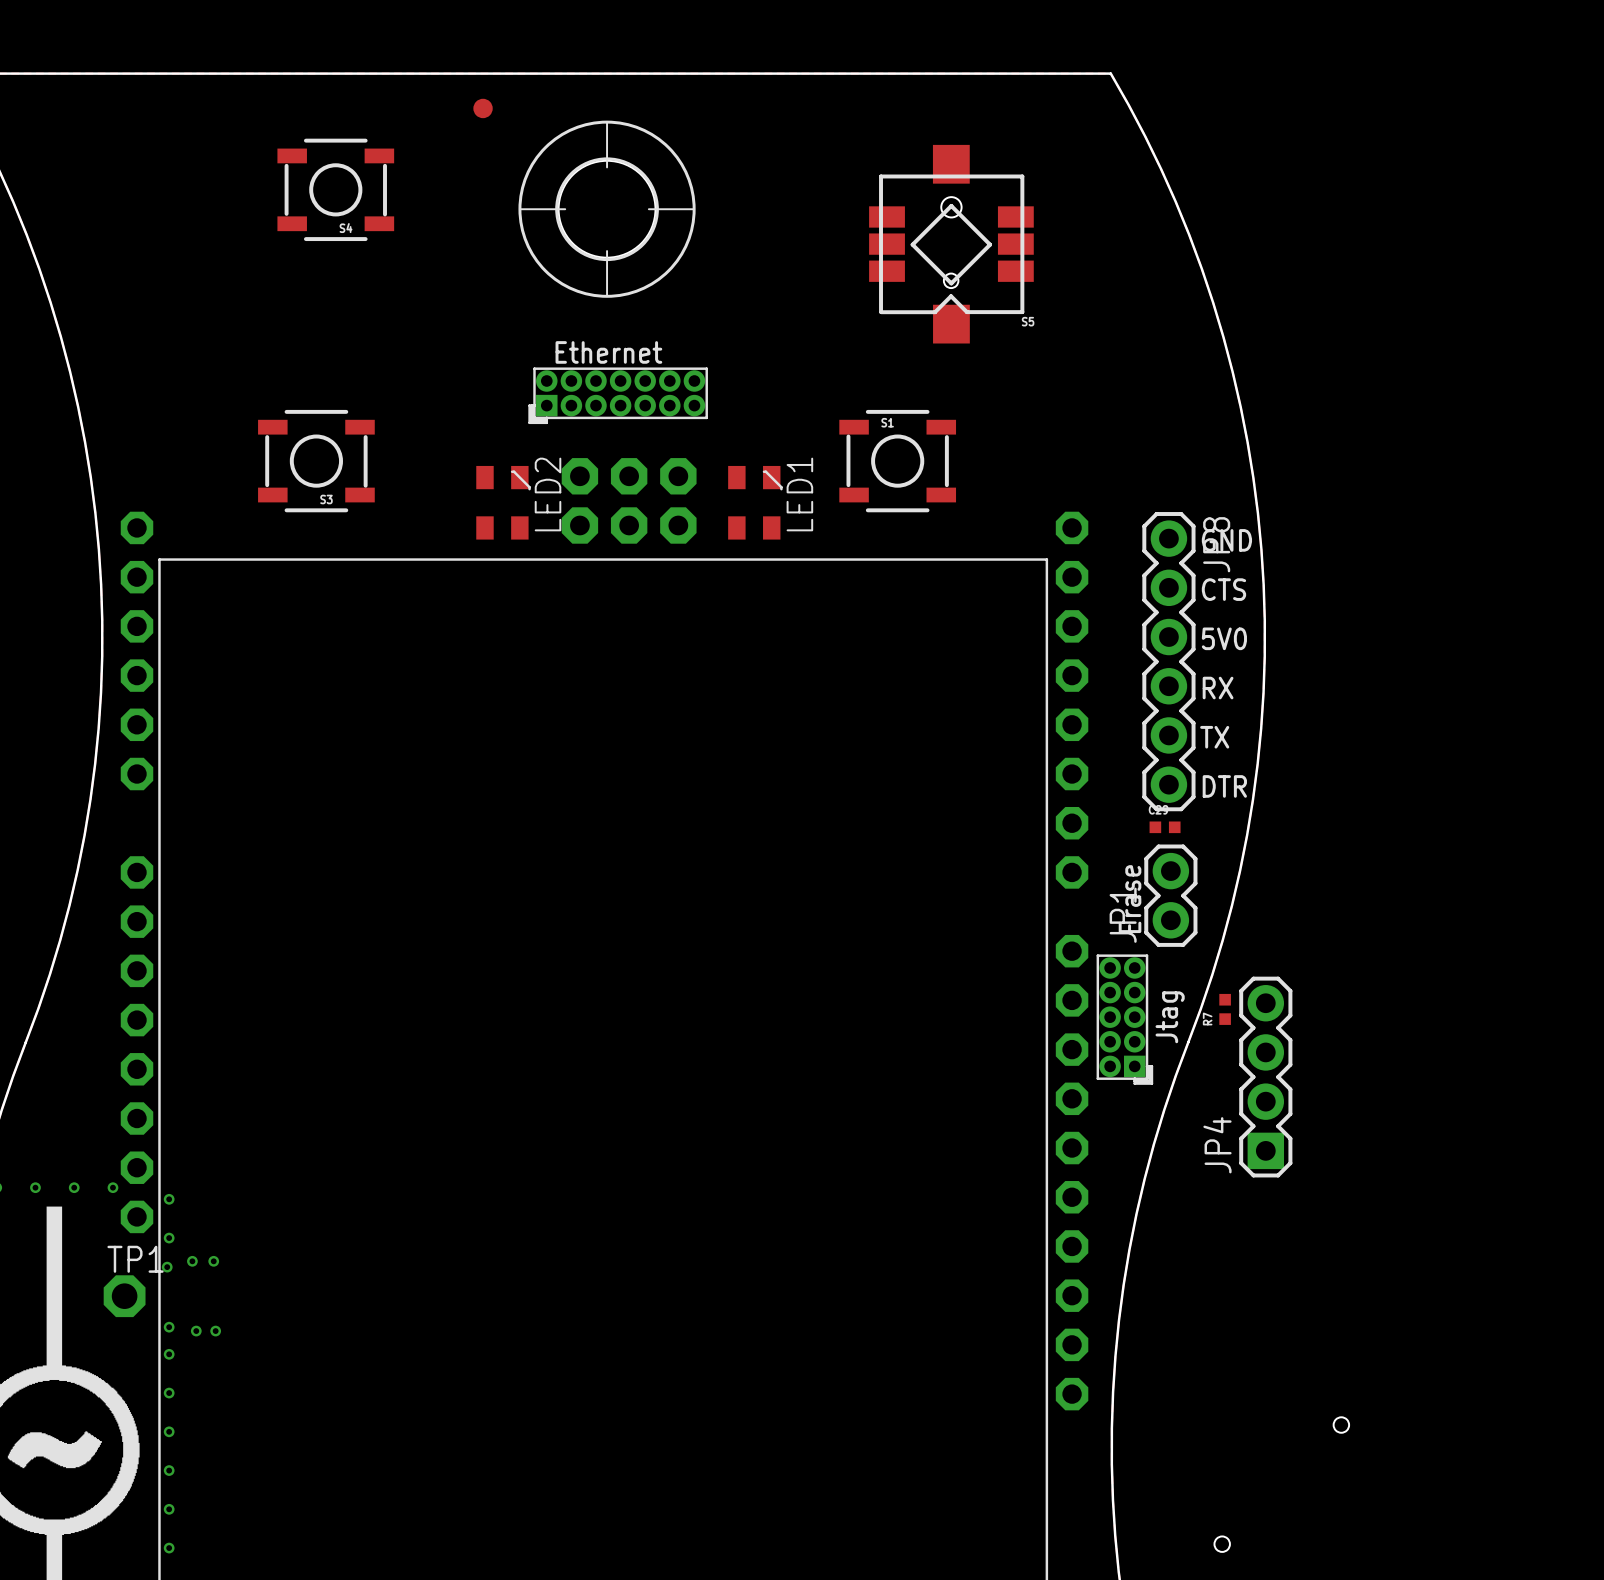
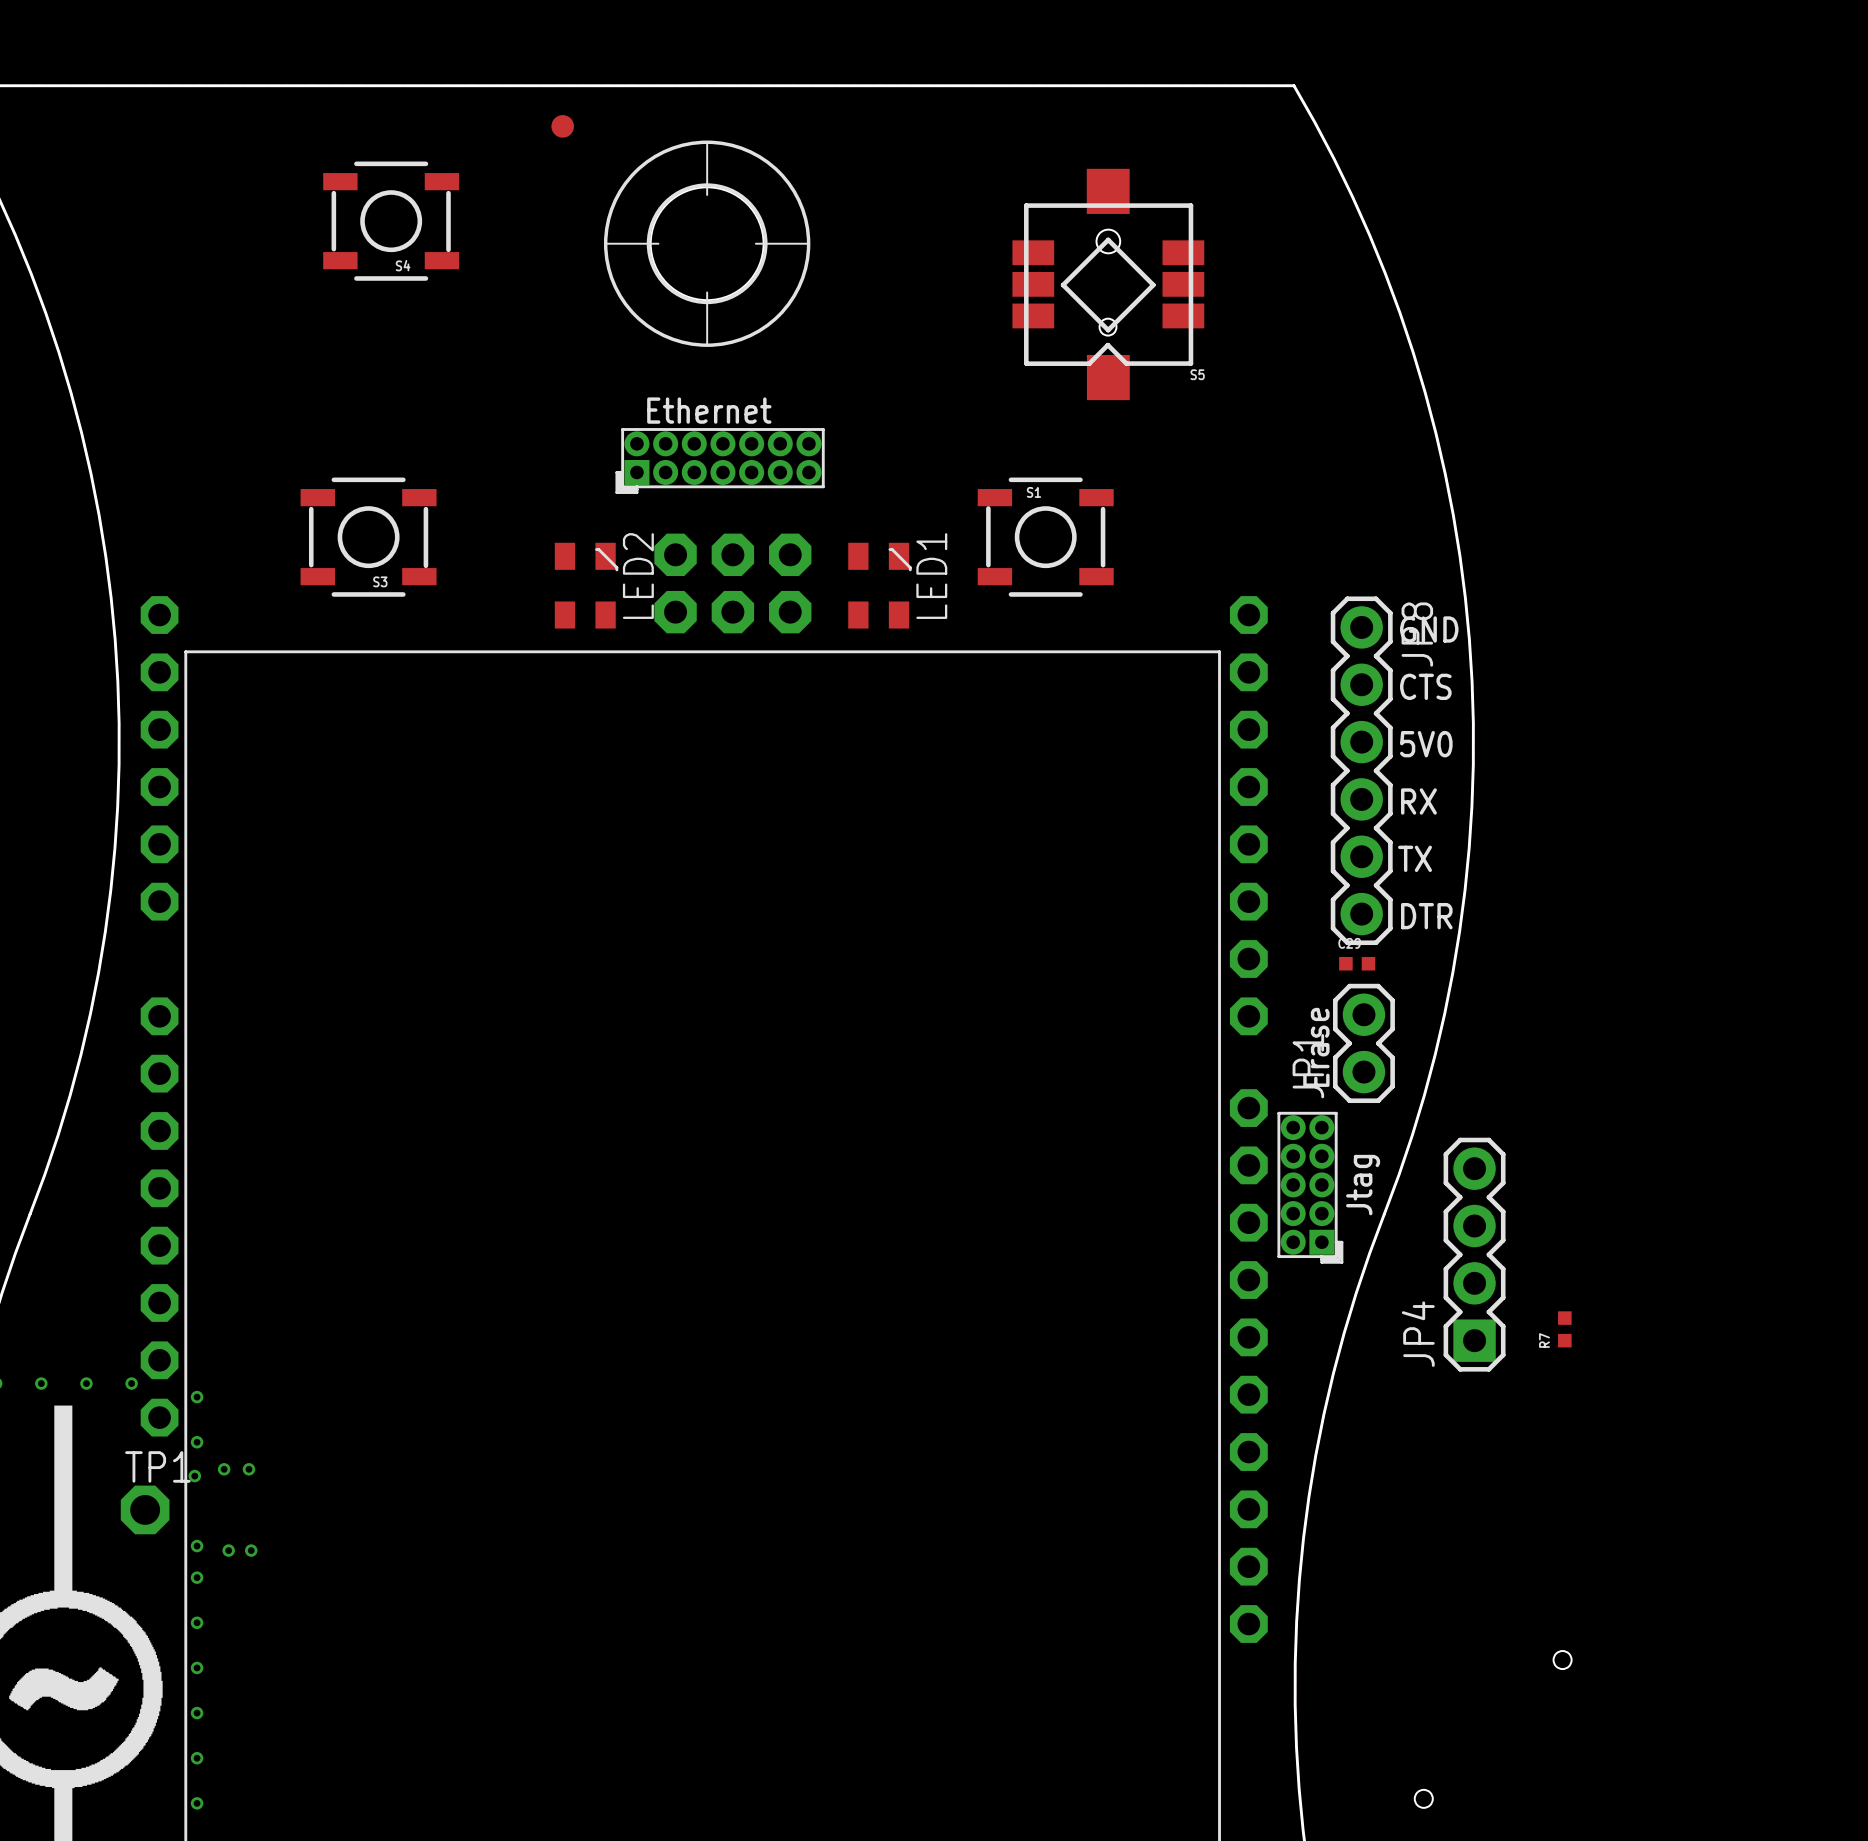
R7 position: (1225, 1009) -> (1564, 1329)

